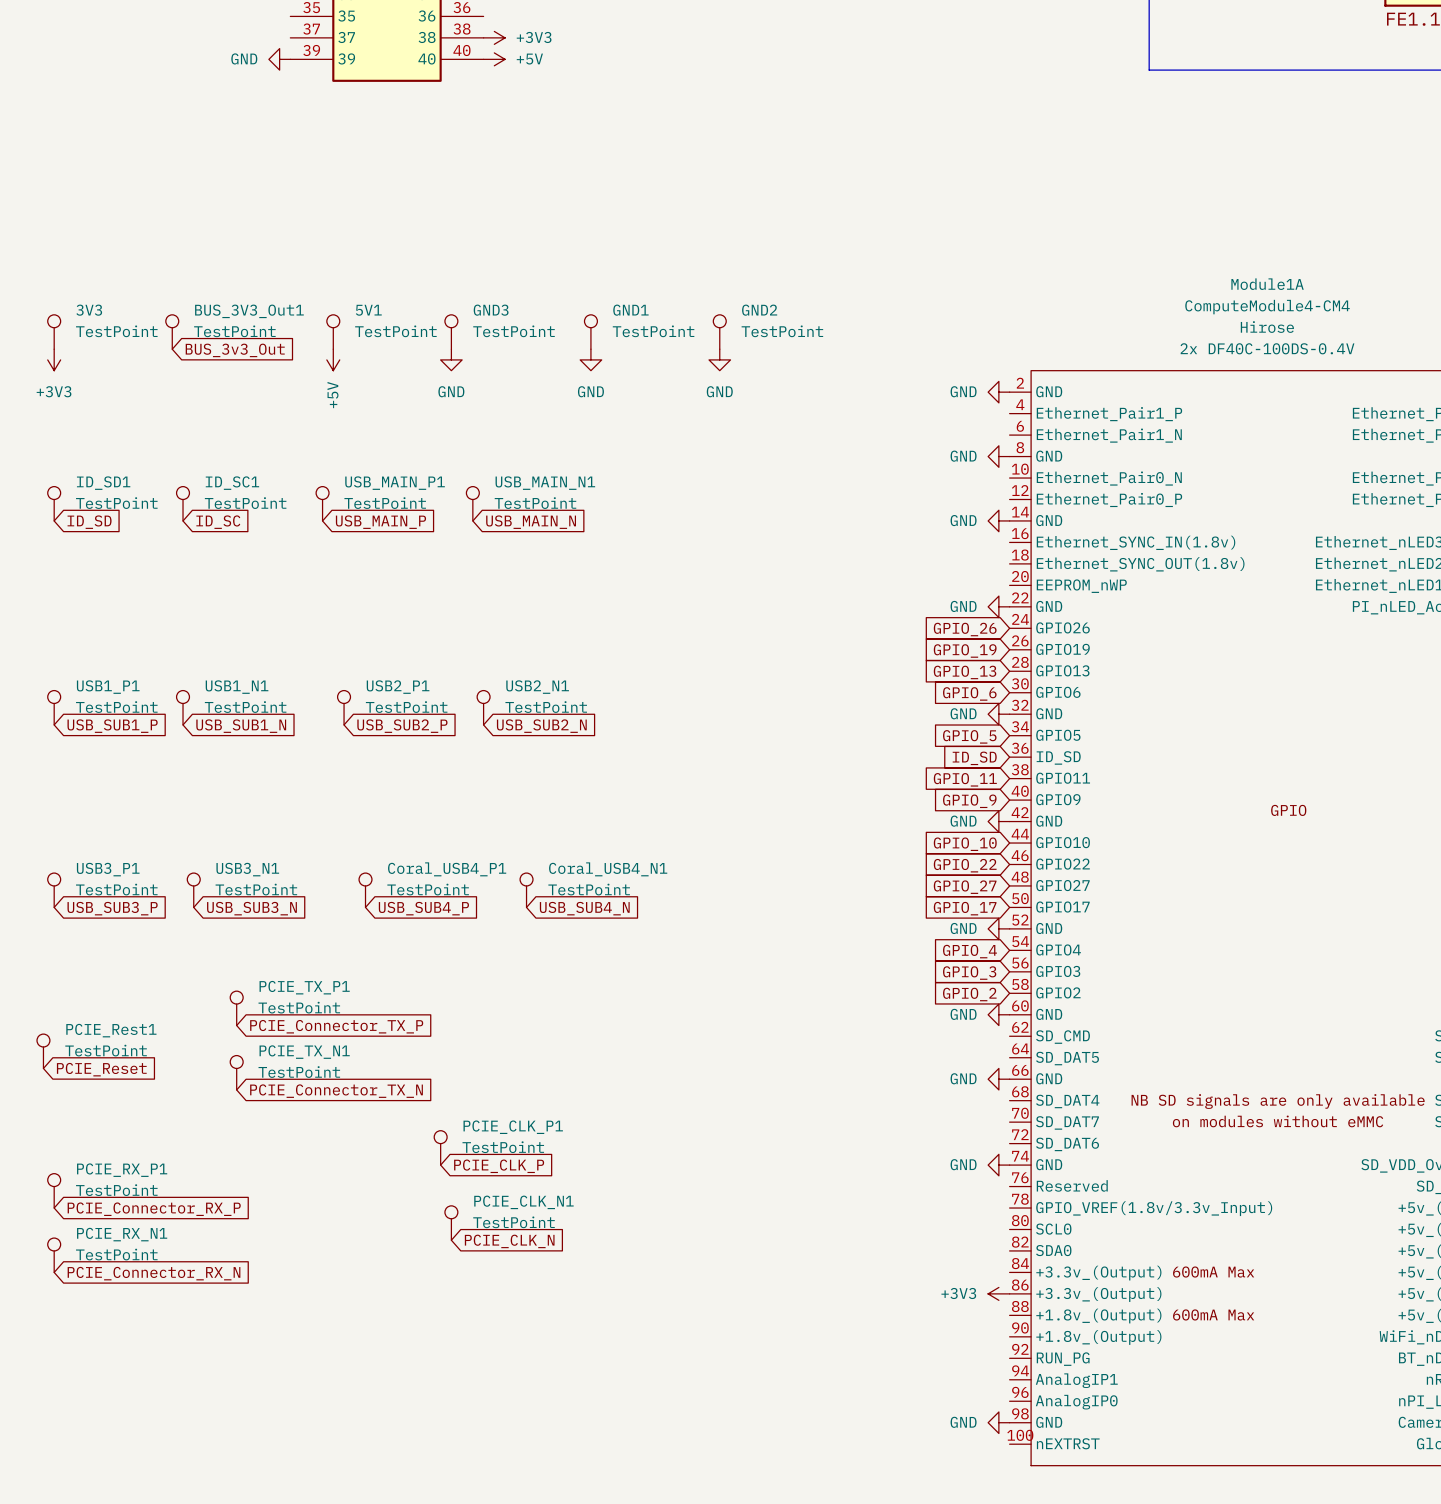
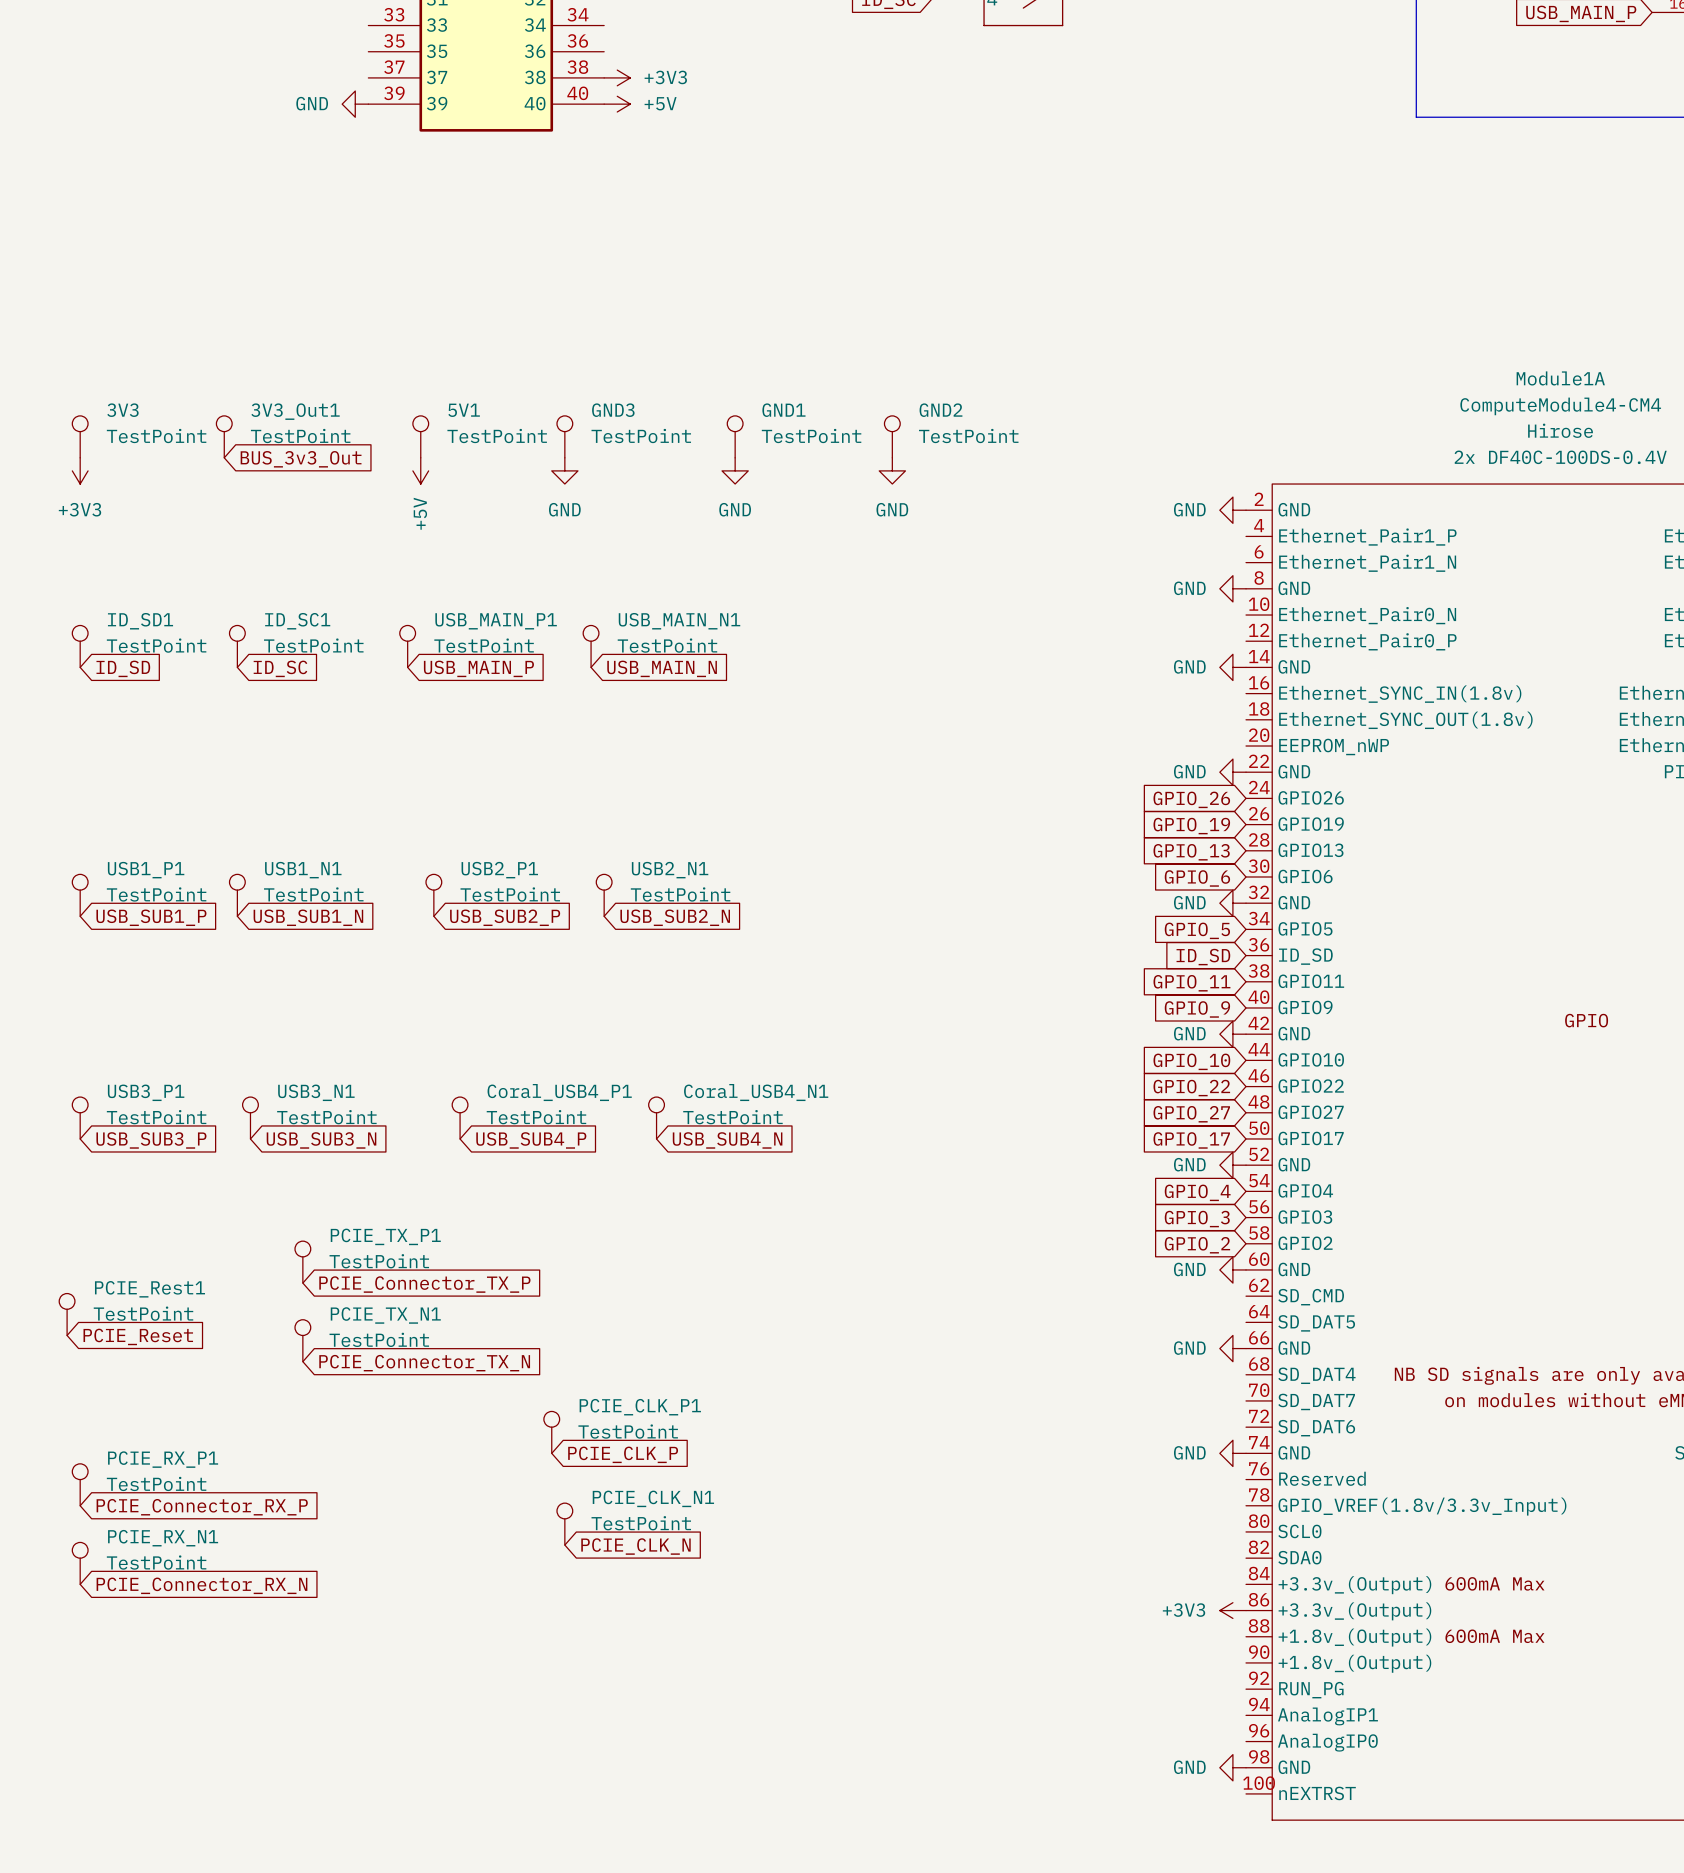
BUS_3V3_Out1 name: BUS_3V3_Out1 (249, 311) -> 3V3_Out1 (295, 411)

